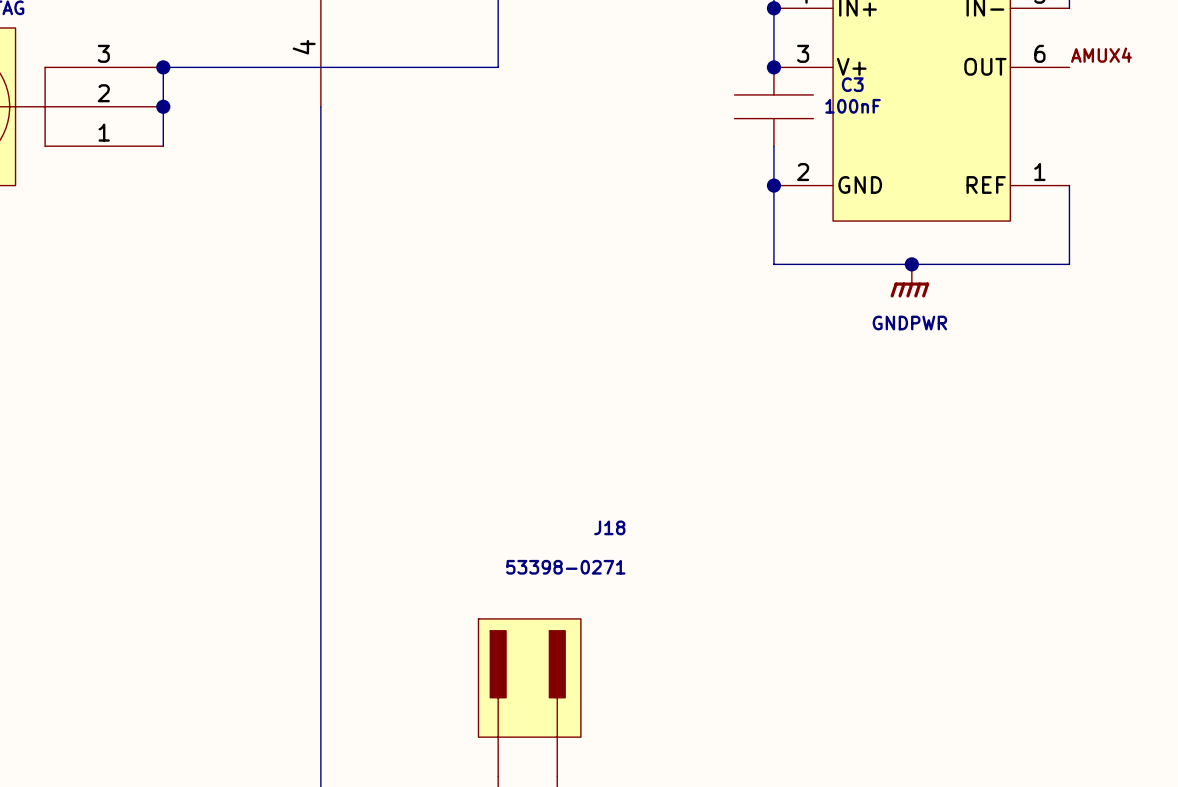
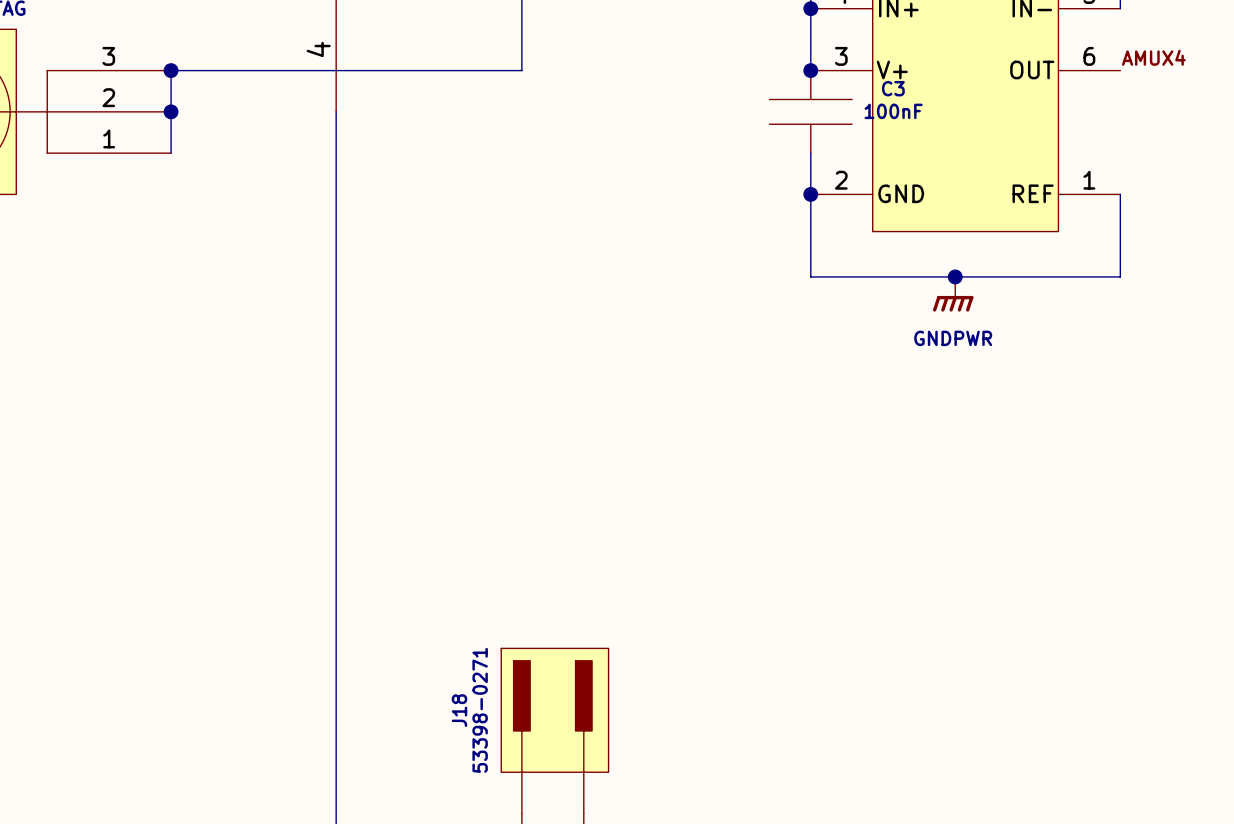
J18 name rotation: 0° (609, 527) -> 90° counterclockwise (459, 710)
J18 name position: J18 (609, 527) -> J18 (459, 710)
J18 value rotation: 0° (565, 567) -> 90° counterclockwise (480, 710)
J18 value position: 53398-0271 (565, 567) -> 53398-0271 (480, 710)

